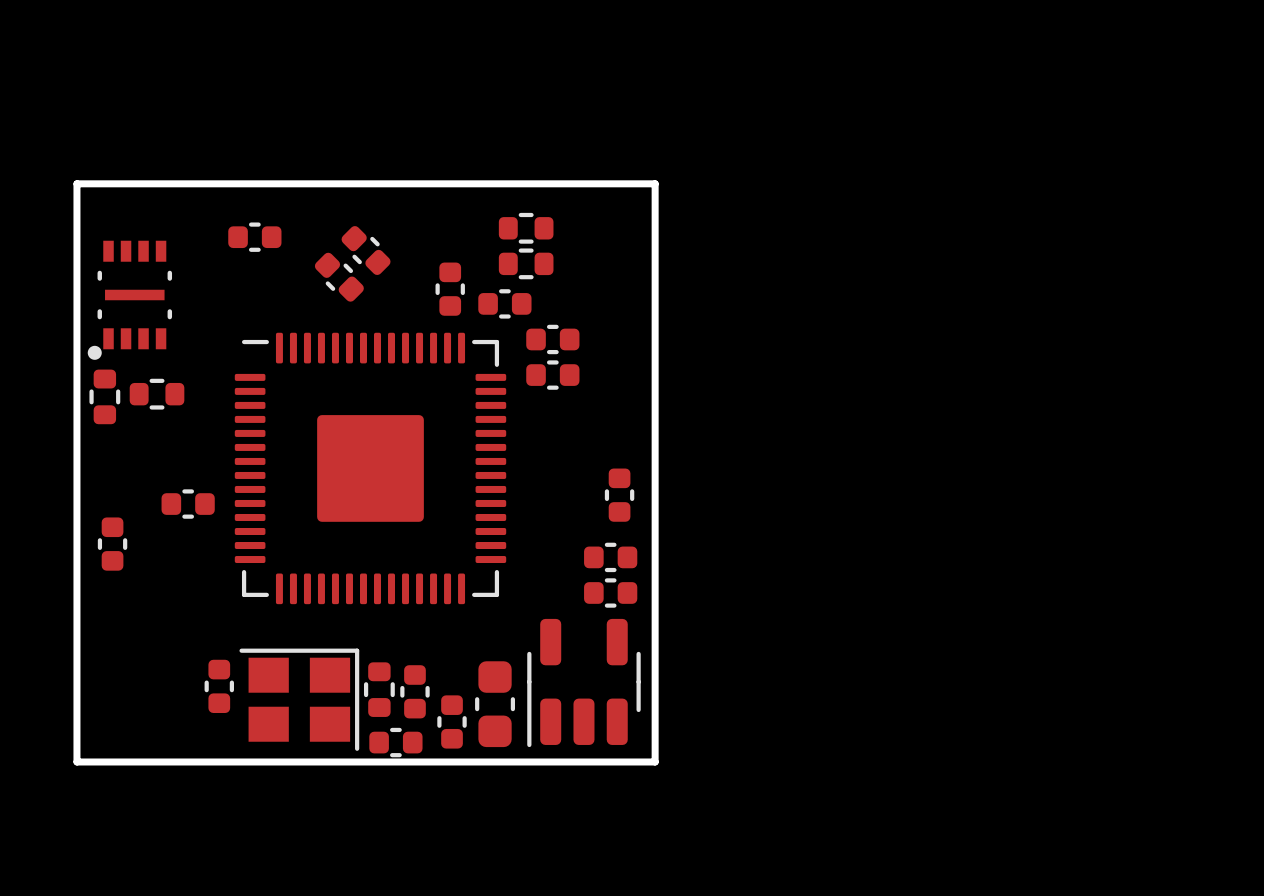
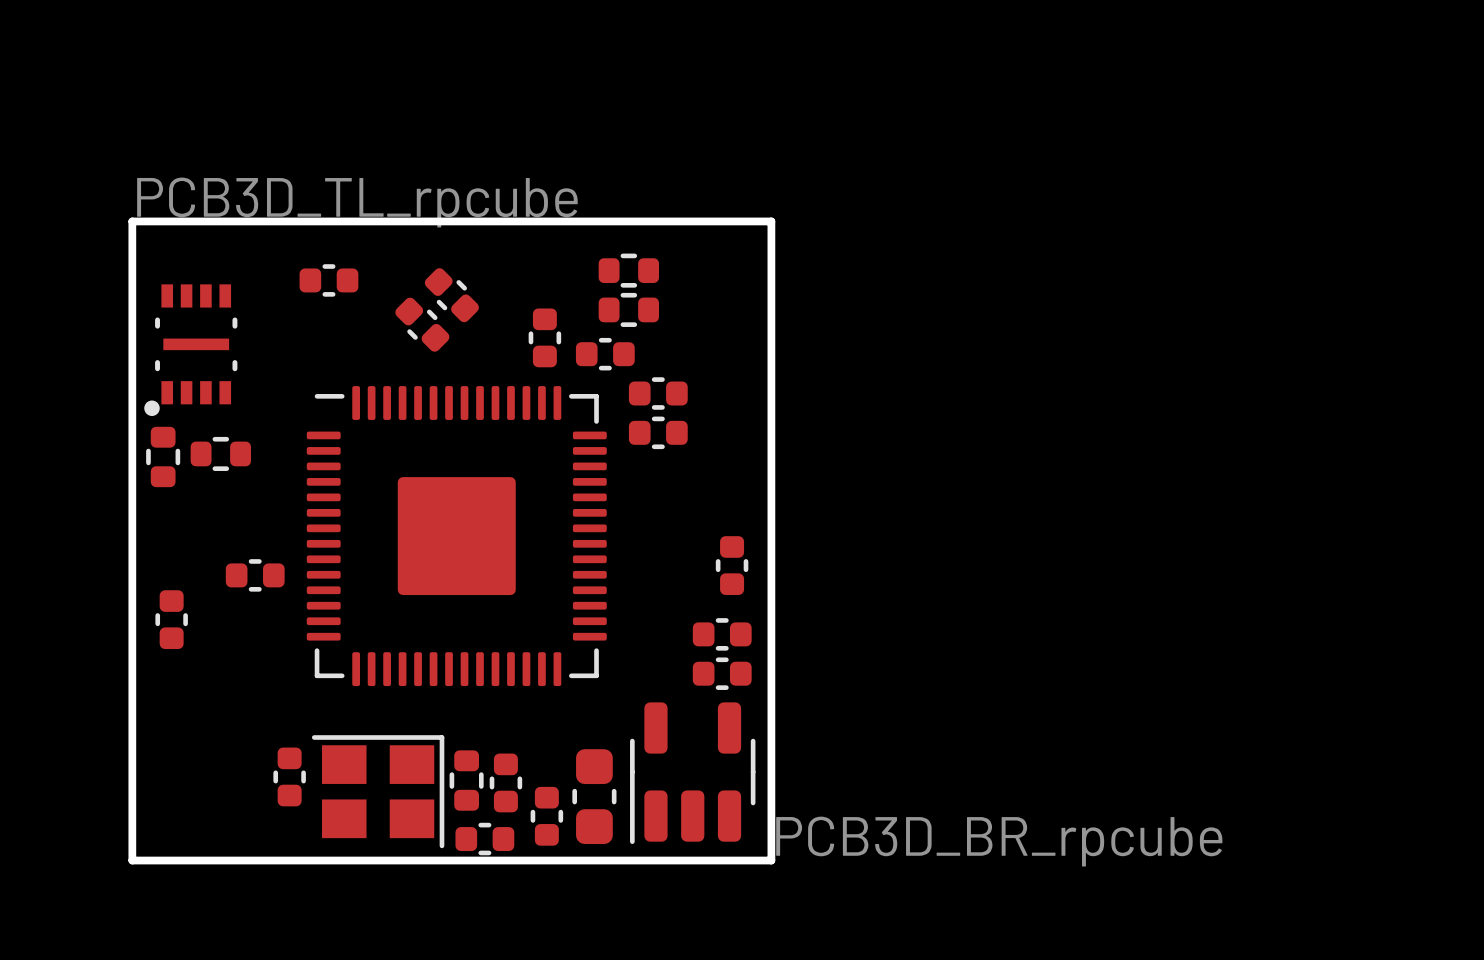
text: none -> PCB3D_TL_rpcube (357, 202)
text: none -> PCB3D_BR_rpcube (999, 841)

